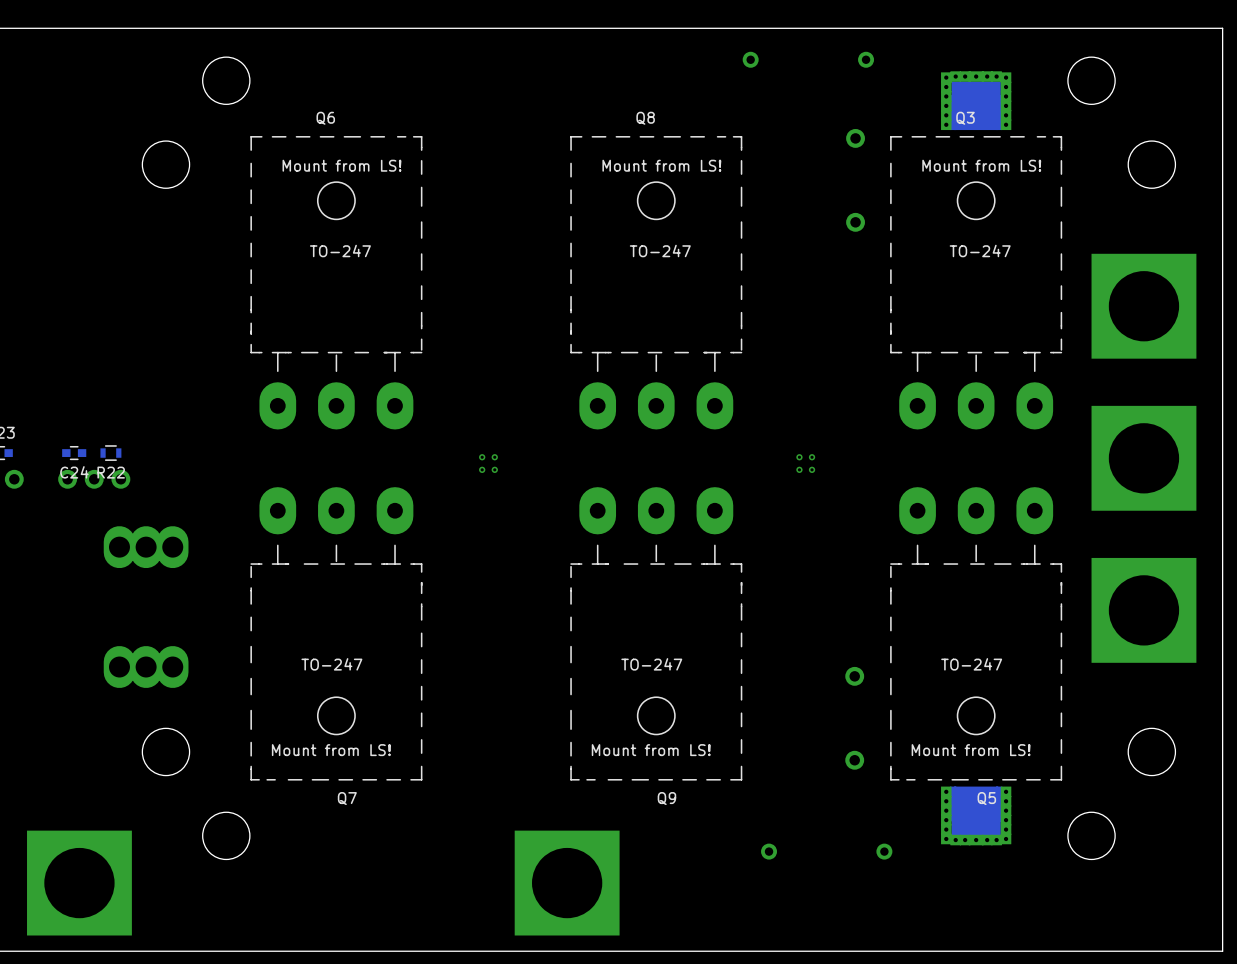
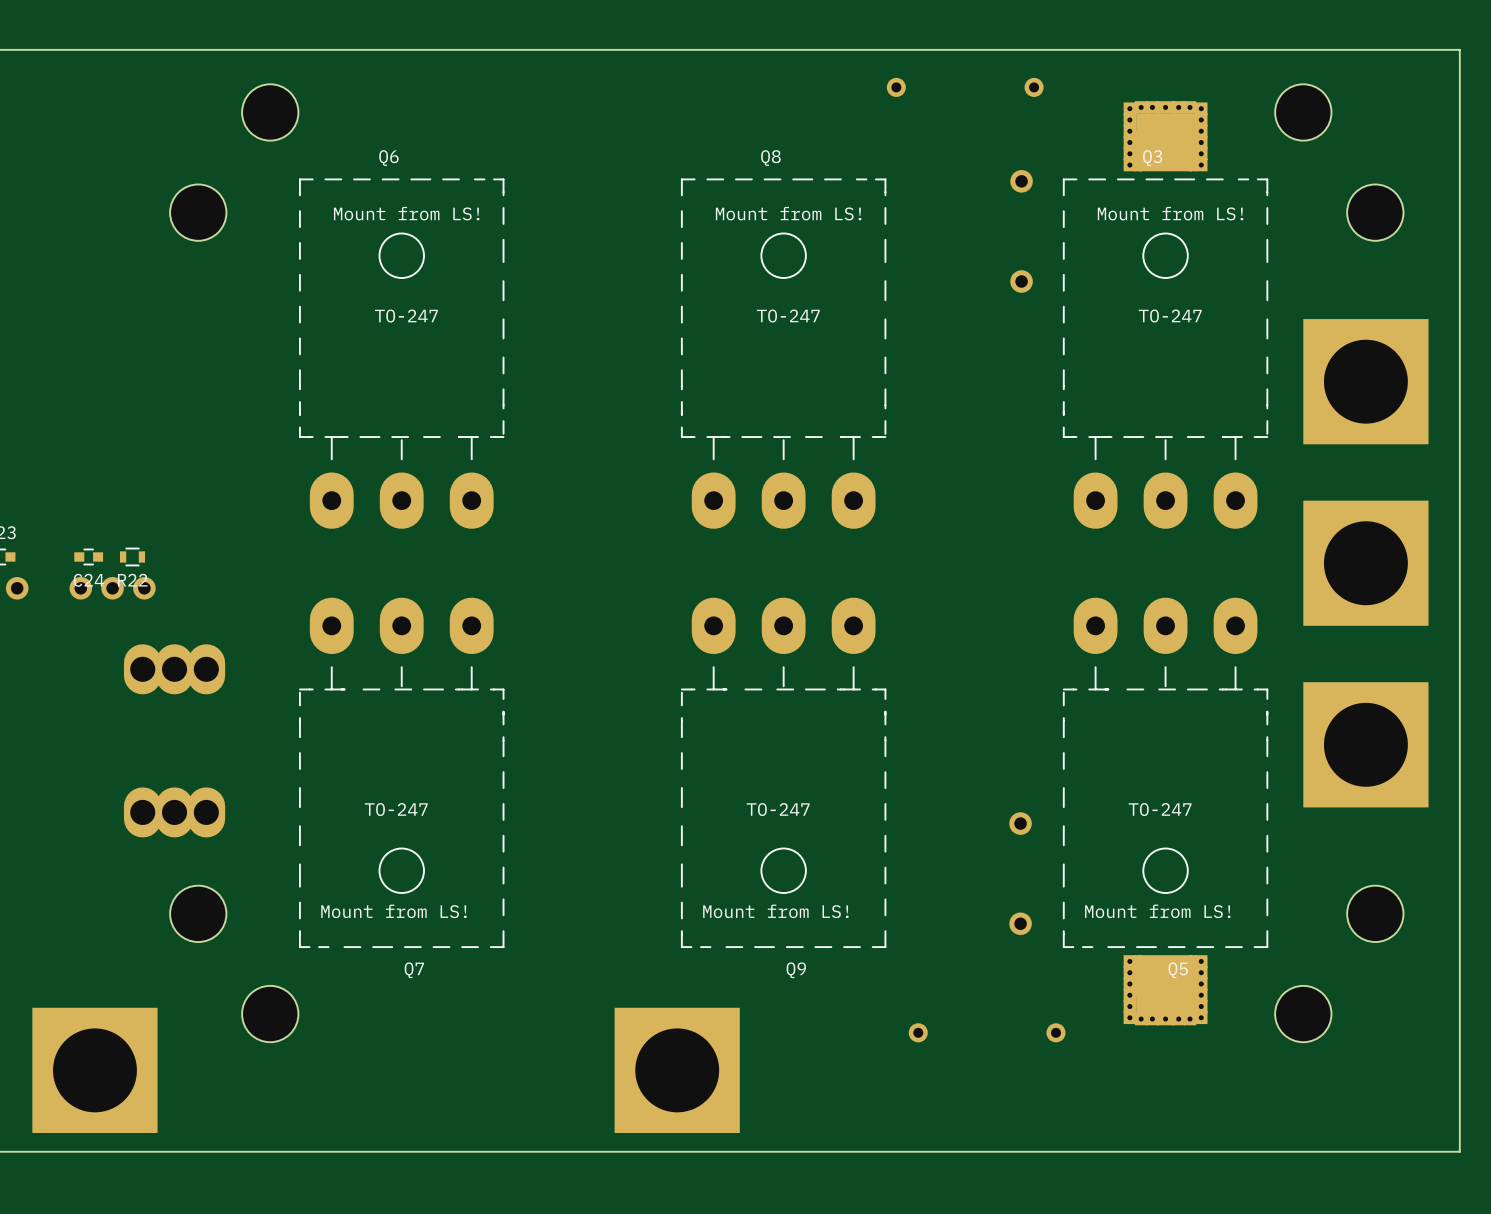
part: (488, 463) -> none
part: (805, 463) -> none

